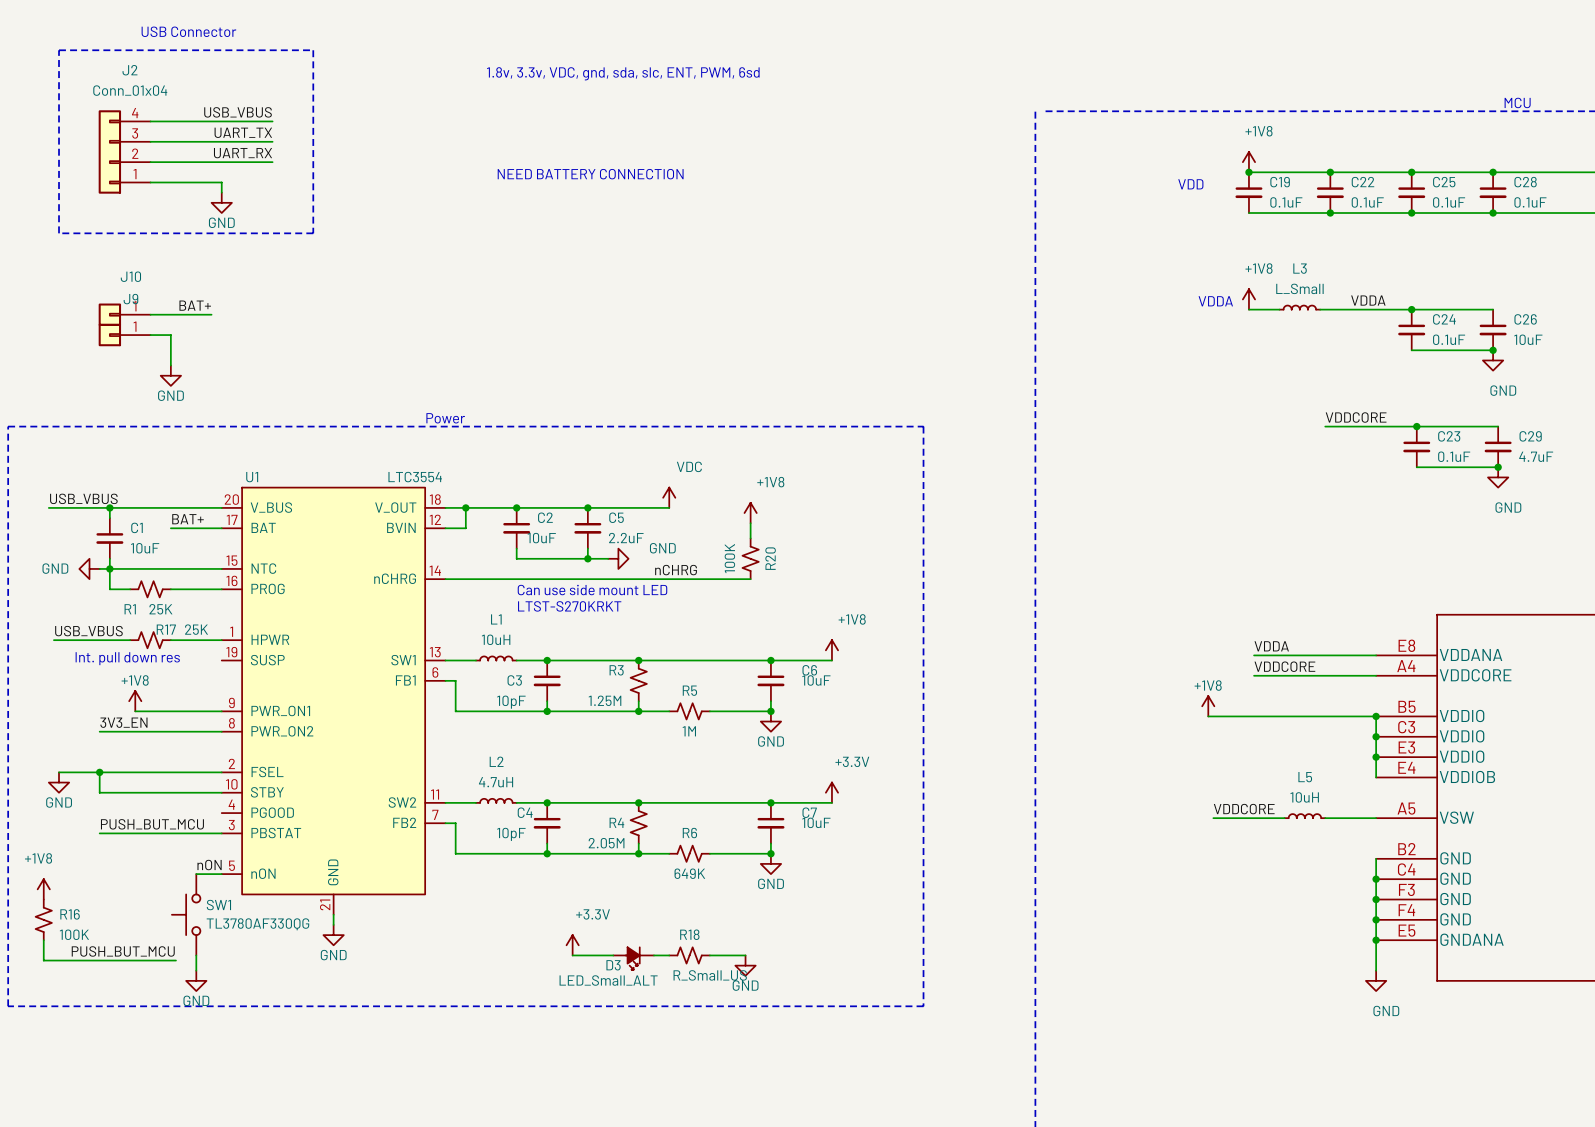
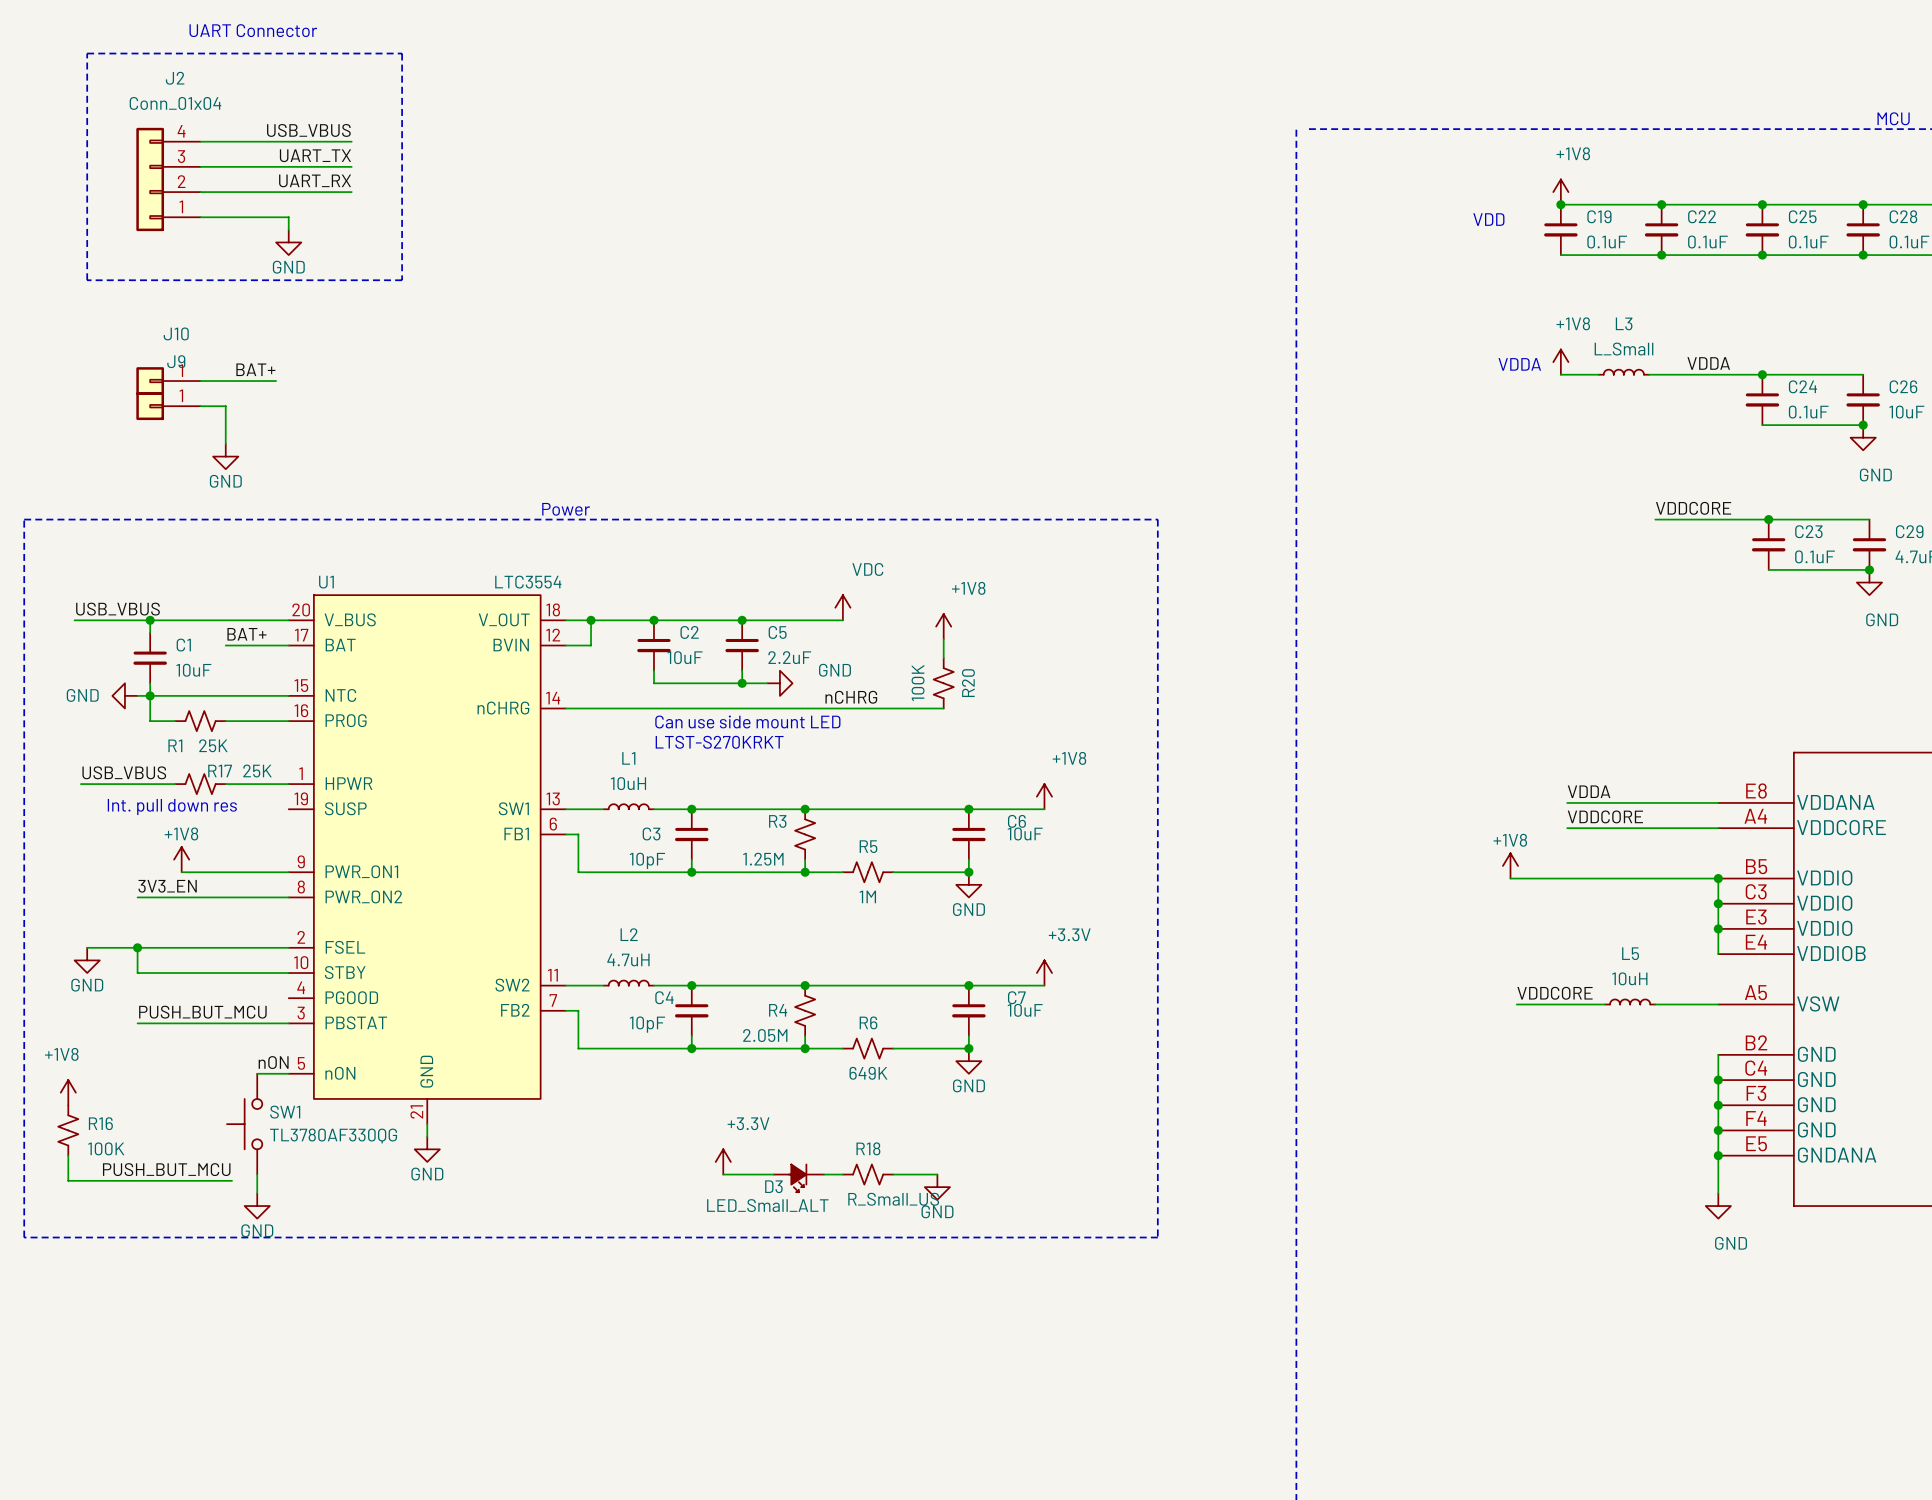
text: USB Connector (188, 31) -> UART Connector (253, 30)
text: 1.8v, 3.3v, VDC, gnd, sda, slc, ENT, PWM, 6sd (623, 73) -> none
text: NEED BATTERY CONNECTION (590, 174) -> none

